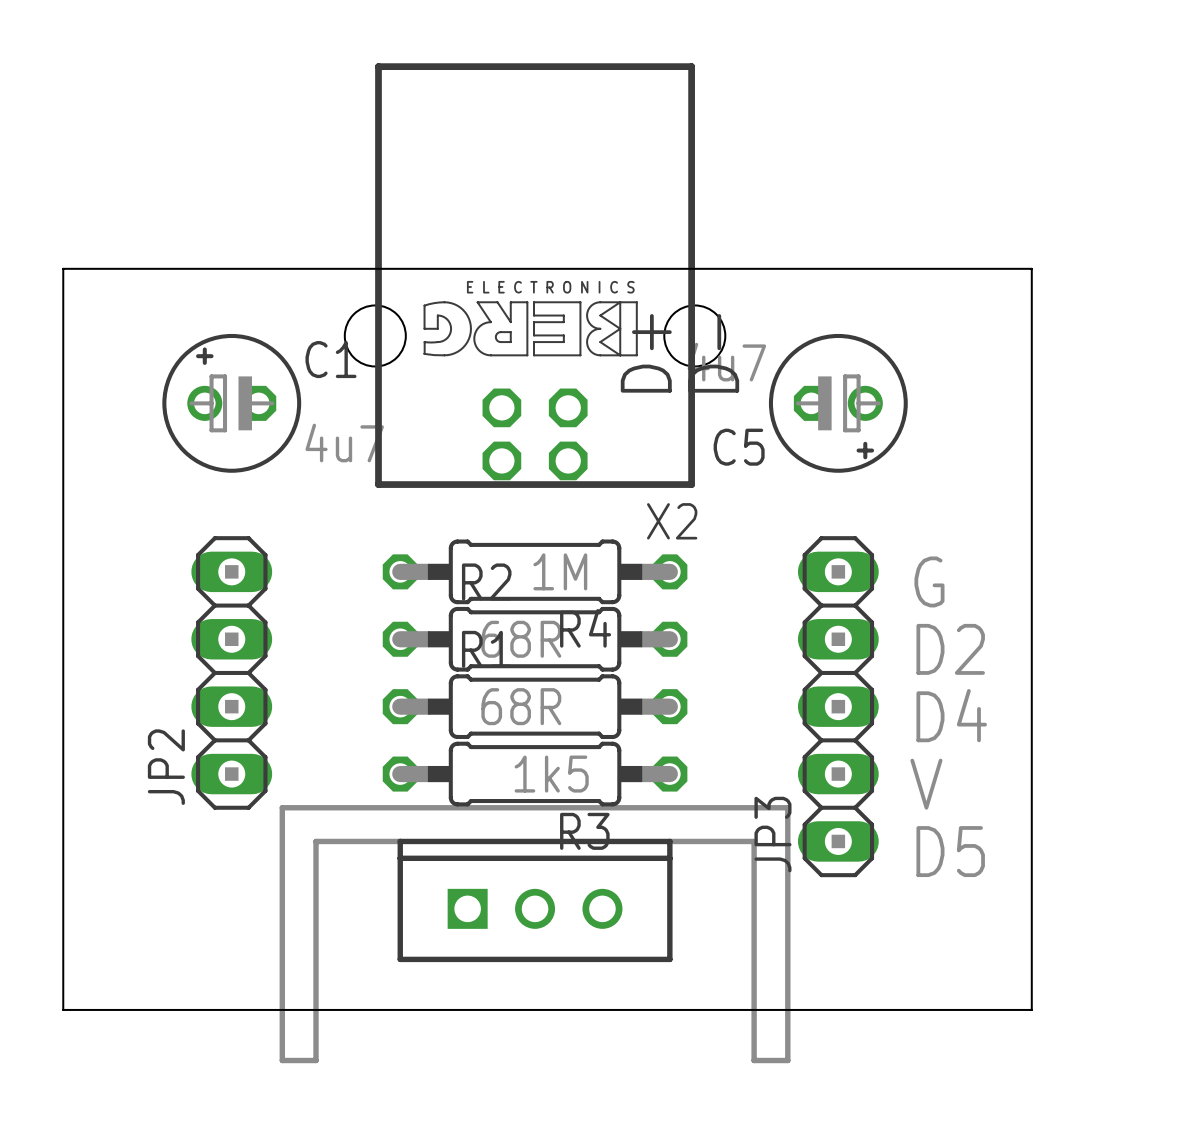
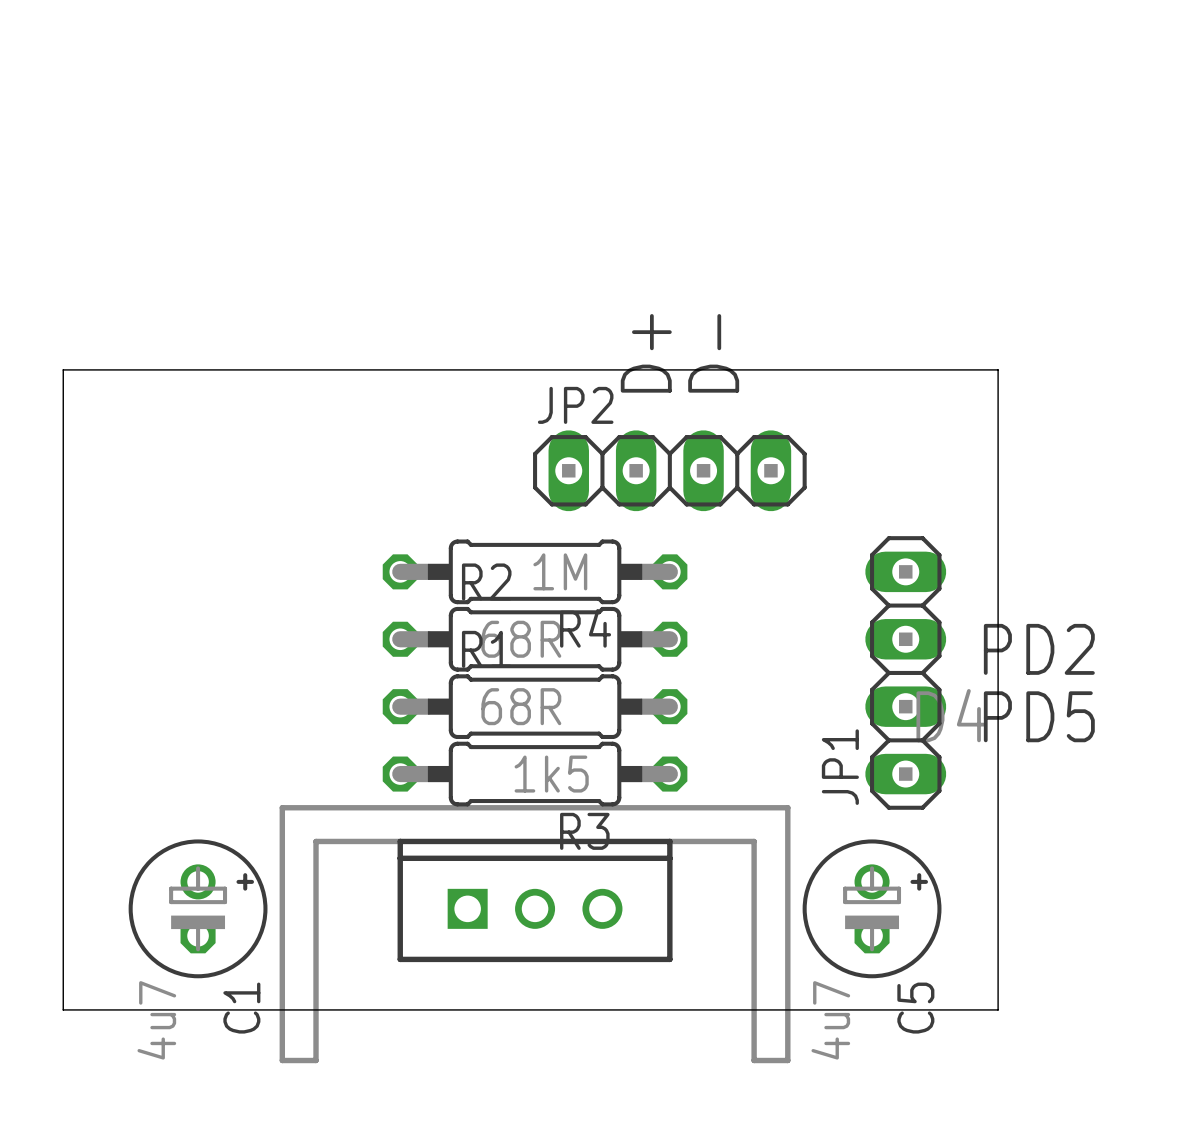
X2: (535, 275) -> none
board edge: (63, 369) (63, 268) (1031, 268) (1031, 1009) (998, 1009) -> (63, 369) (998, 369) (998, 1009)
C1 rotation: 0° (231, 403) -> 90° clockwise (198, 908)
C1 position: (231, 403) -> (198, 908)
C5 rotation: 0° (838, 403) -> 90° counterclockwise (872, 908)
C5 position: (838, 403) -> (872, 908)
text: G (929, 581) -> none
text: D2 (950, 649) -> PD2 (1039, 649)
JP2 rotation: 0° (231, 672) -> 90° clockwise (669, 470)
JP2 position: (231, 672) -> (669, 470)
JP1: none -> (905, 672)
JP3: (838, 706) -> none
text: none -> PD5 (1039, 716)
text: V (926, 784) -> none
text: D5 (950, 851) -> none

